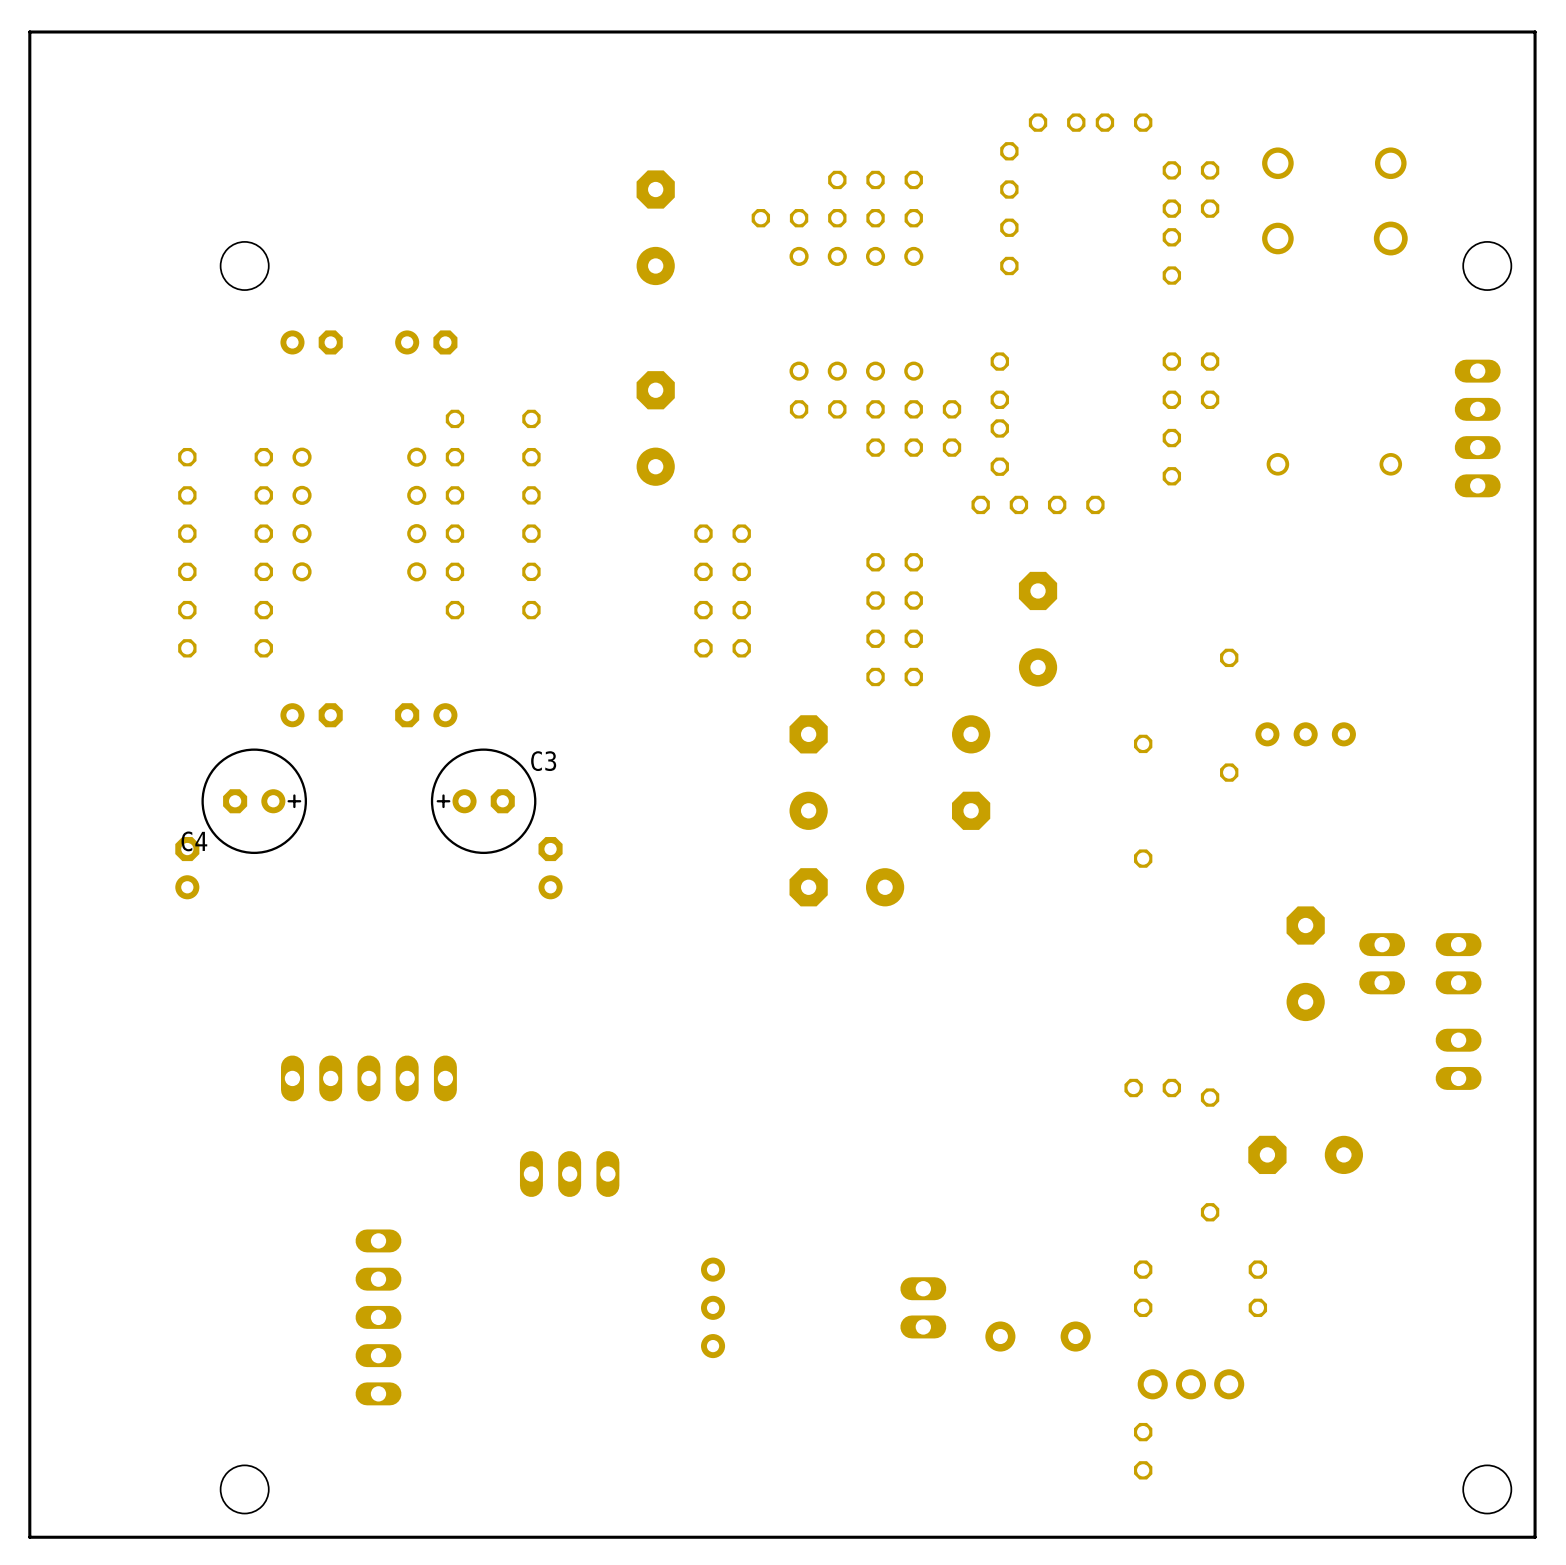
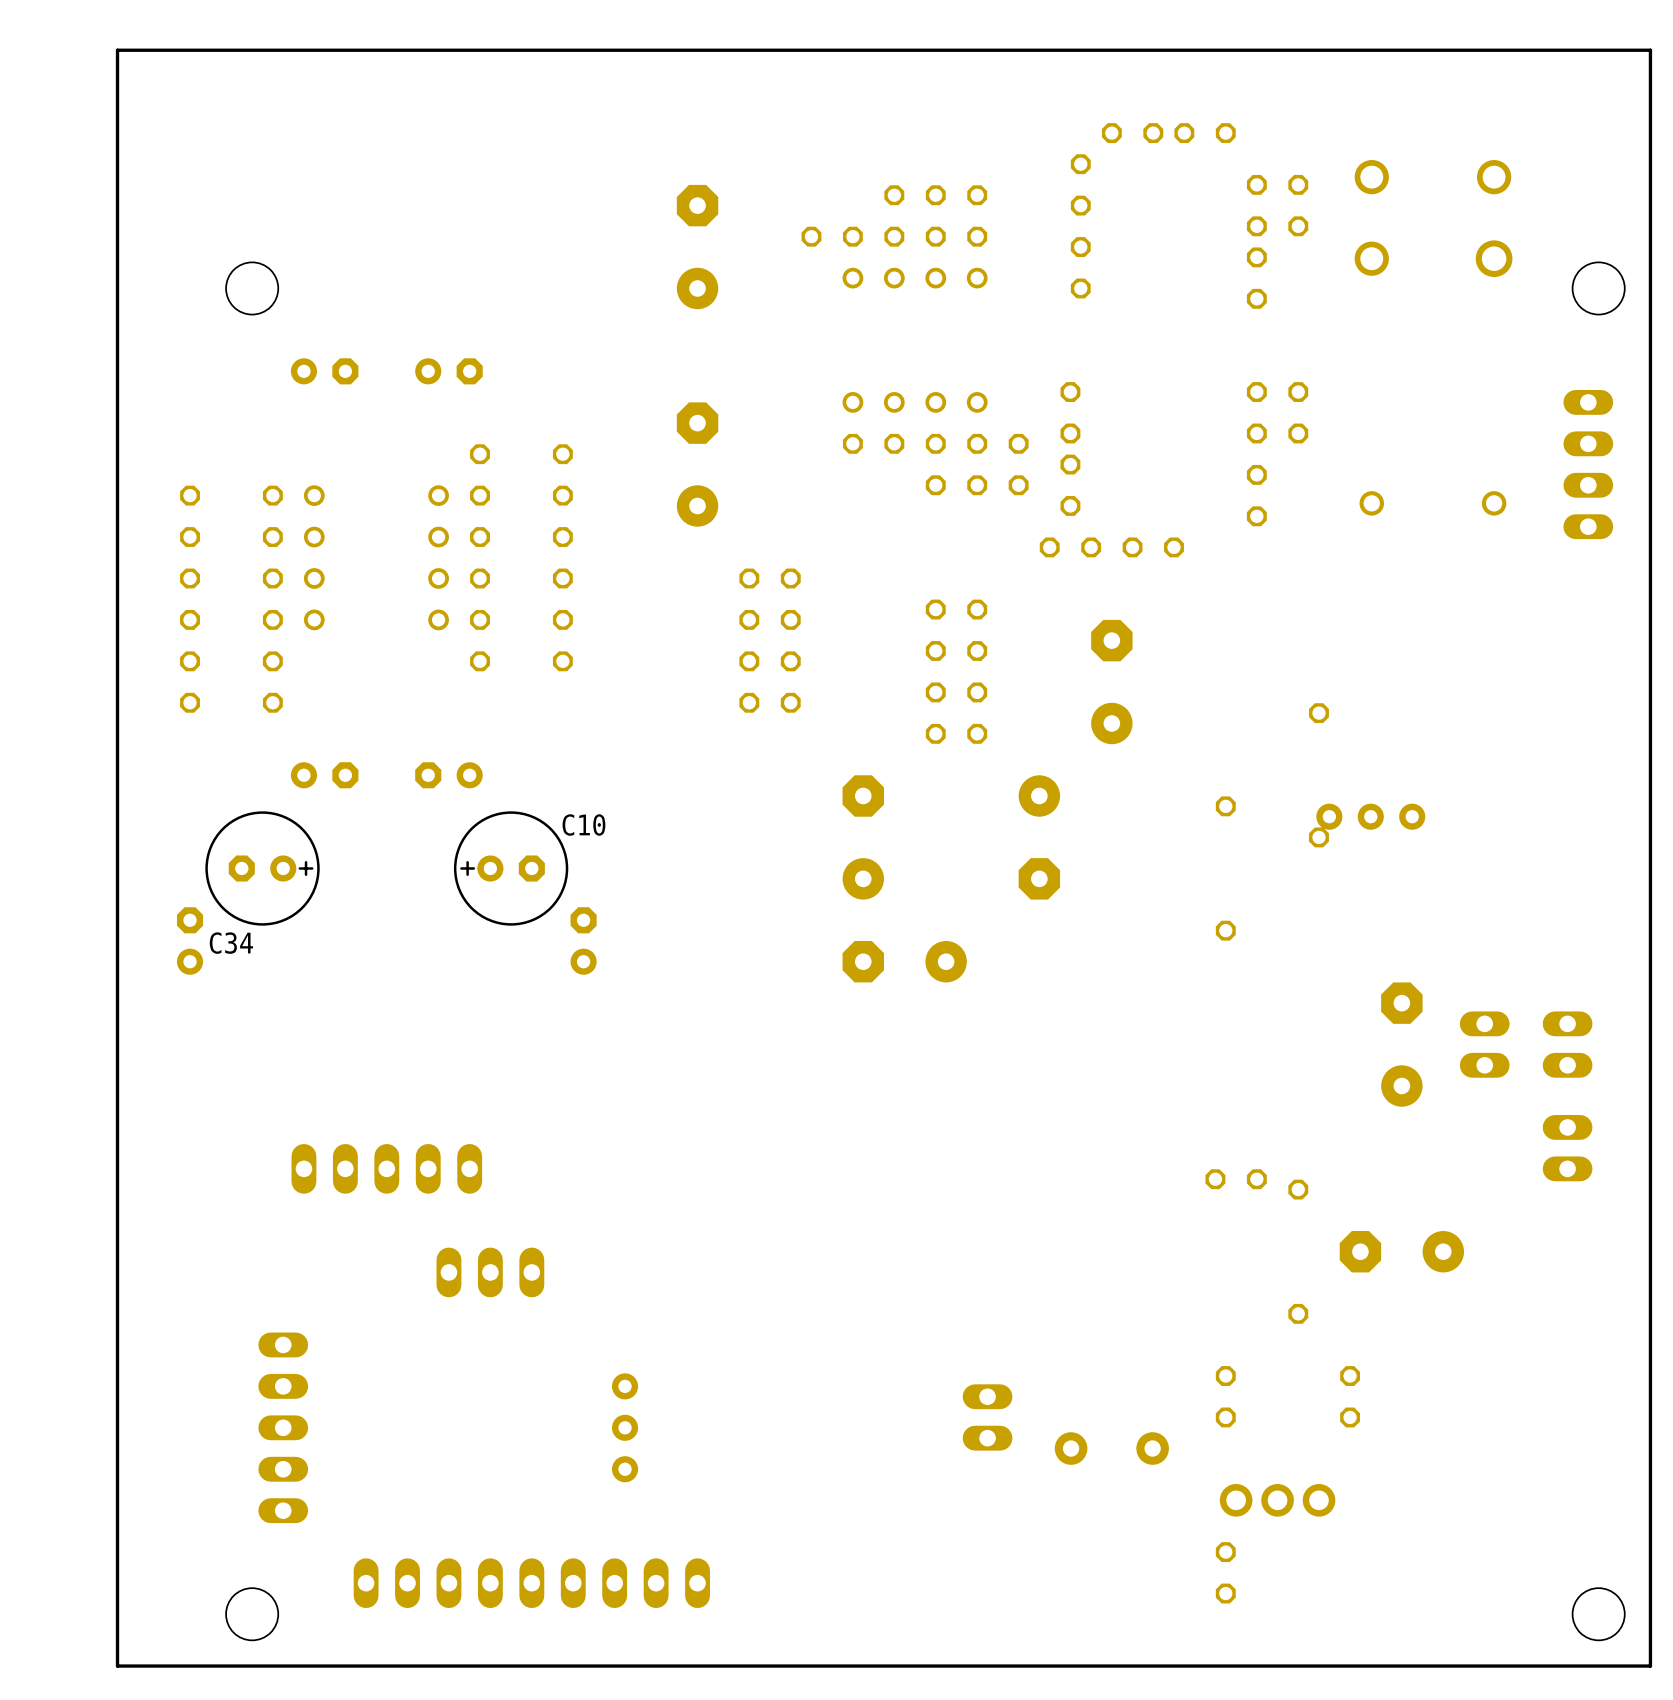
board edge: (1535, 46) (1535, 31) (29, 31) (29, 1537) (120, 1537) -> (1650, 50) (117, 50) (117, 1666)
part position: (1305, 734) -> (1370, 816)
C3 name: C3 (543, 761) -> C10 (583, 825)
C4 name: C4 (194, 841) -> C34 (231, 943)
part position: (569, 1174) -> (490, 1272)
part position: (713, 1307) -> (625, 1427)
part position: (378, 1317) -> (283, 1427)
part: none -> (531, 1583)

